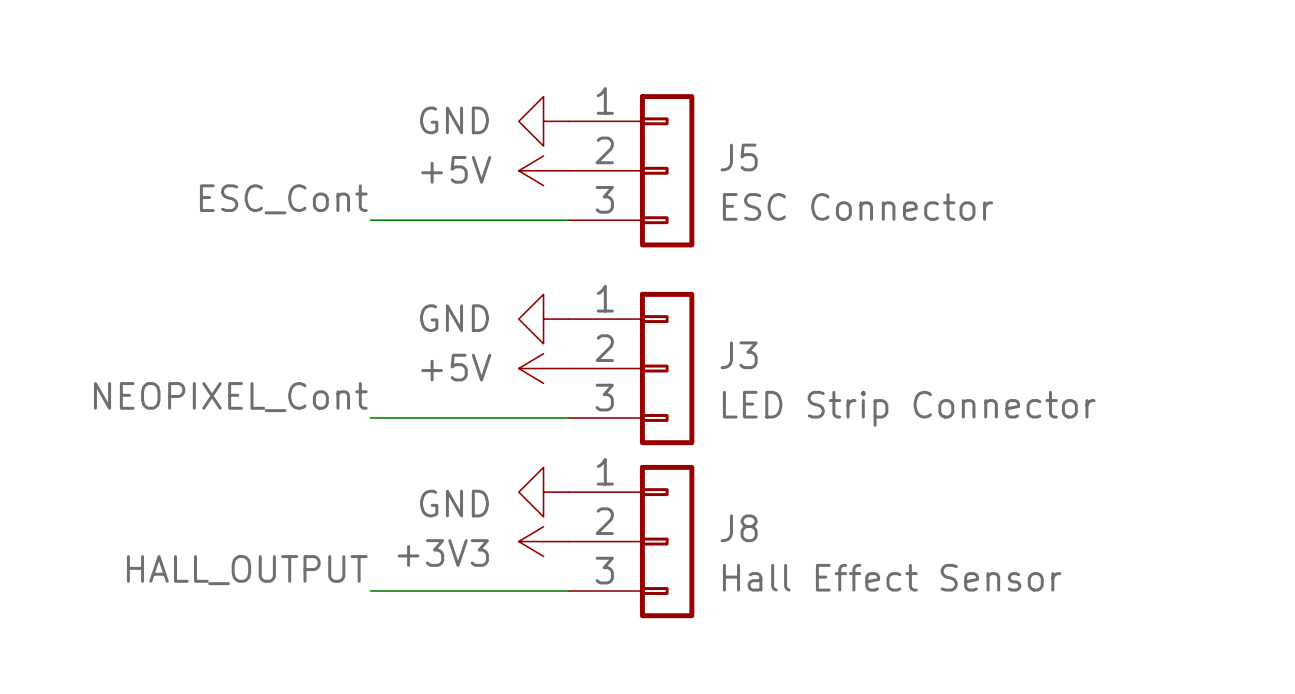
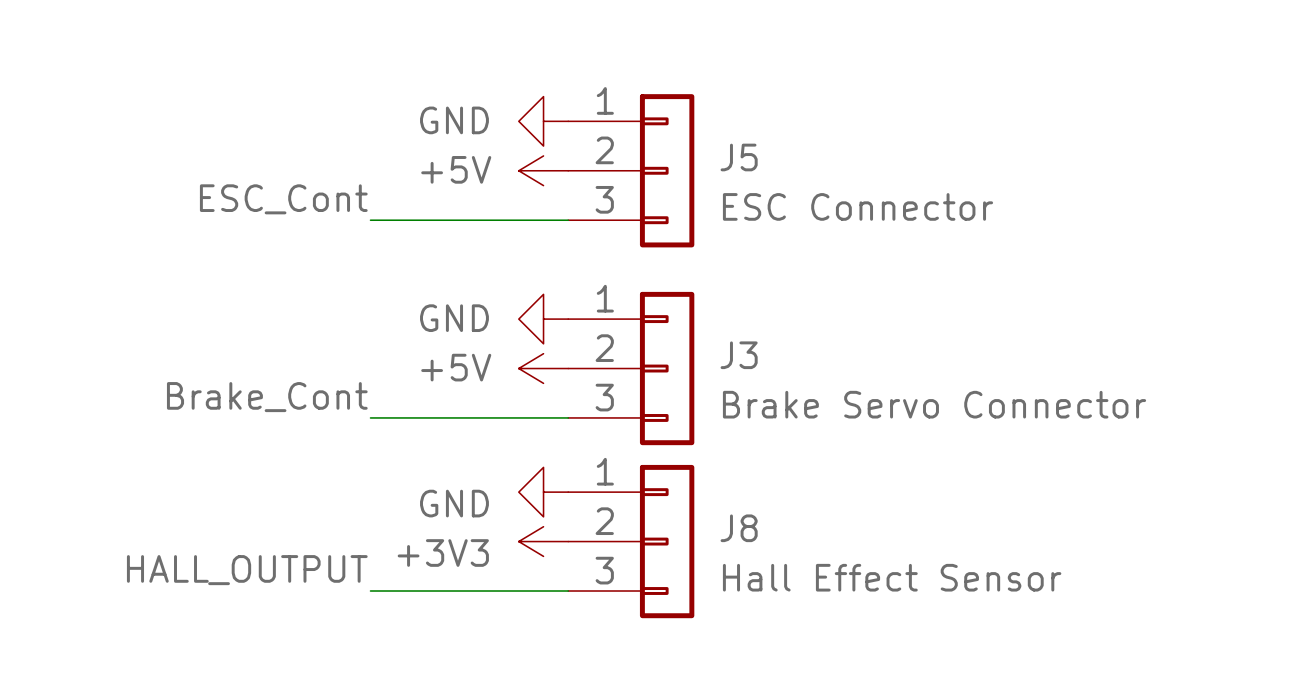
label: NEOPIXEL_Cont (230, 397) -> Brake_Cont (267, 397)
J3 value: LED Strip Connector (909, 408) -> Brake Servo Connector (934, 404)

